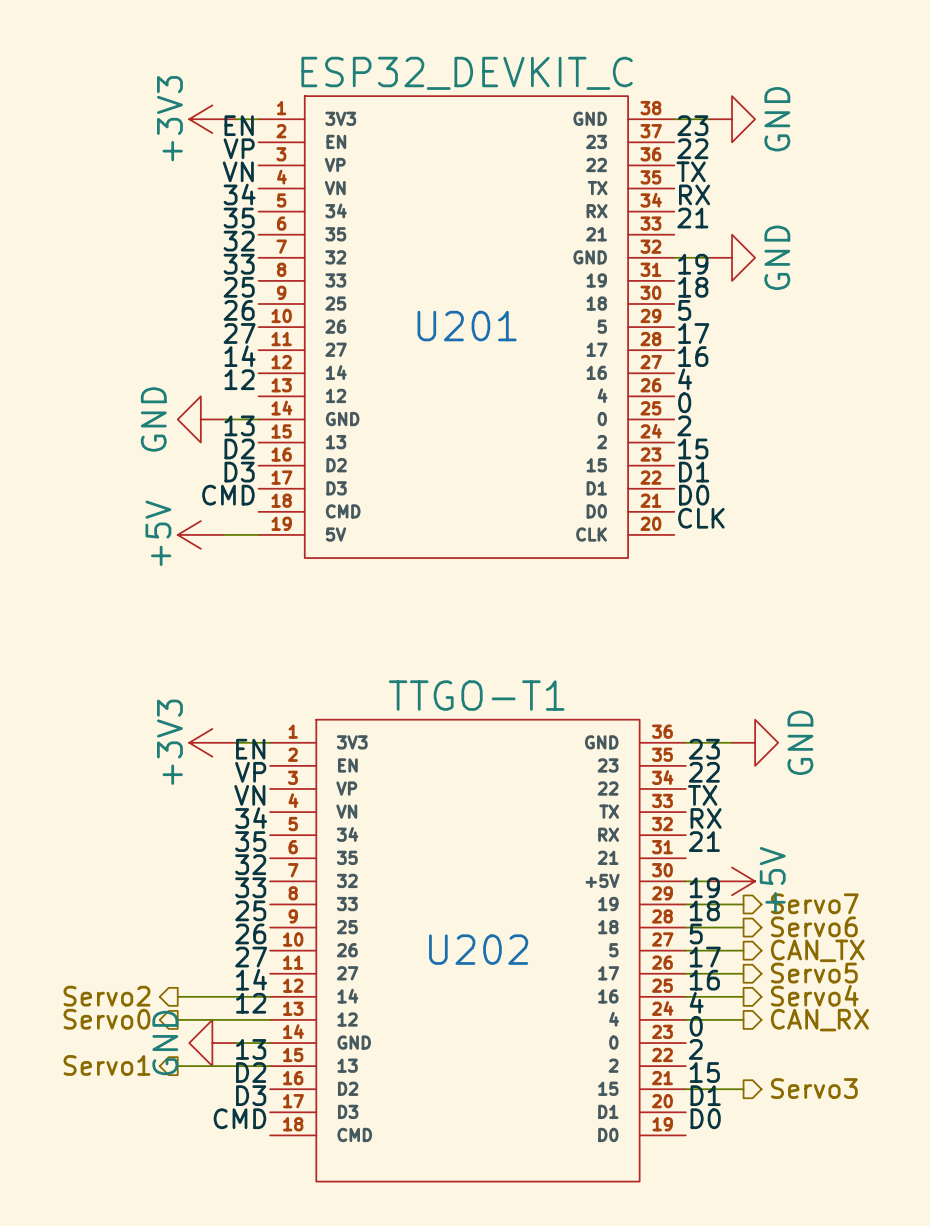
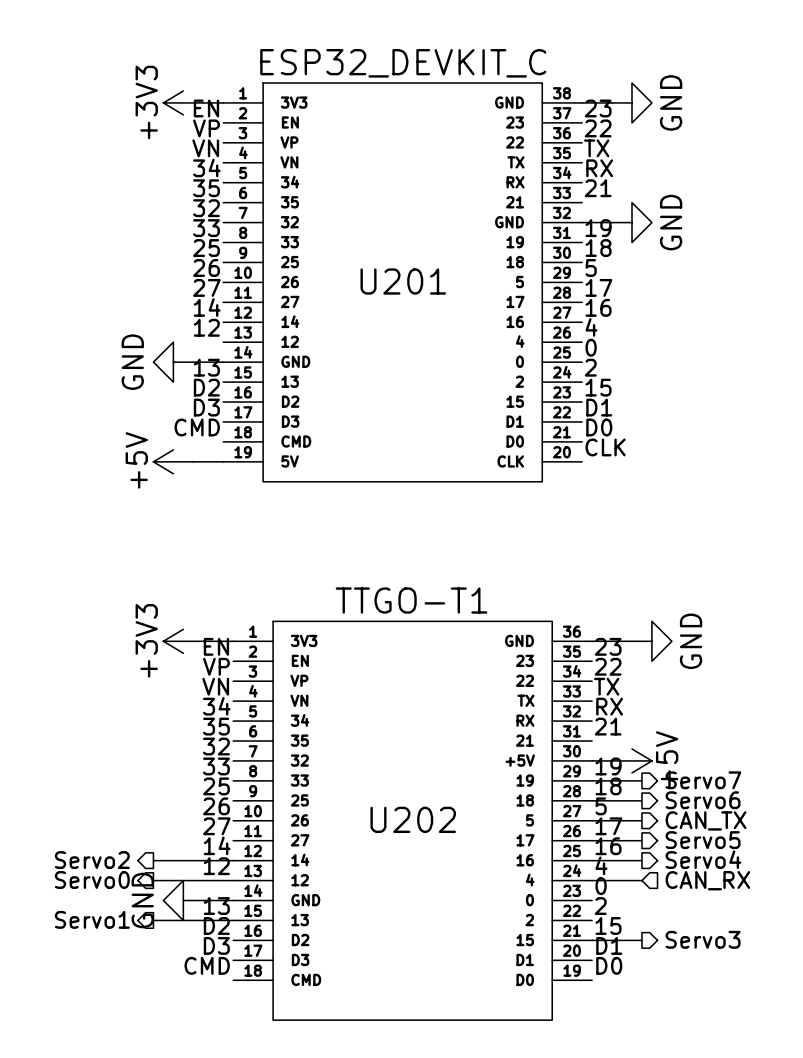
hierarchical label shape: output (819, 1020) -> input (707, 880)

